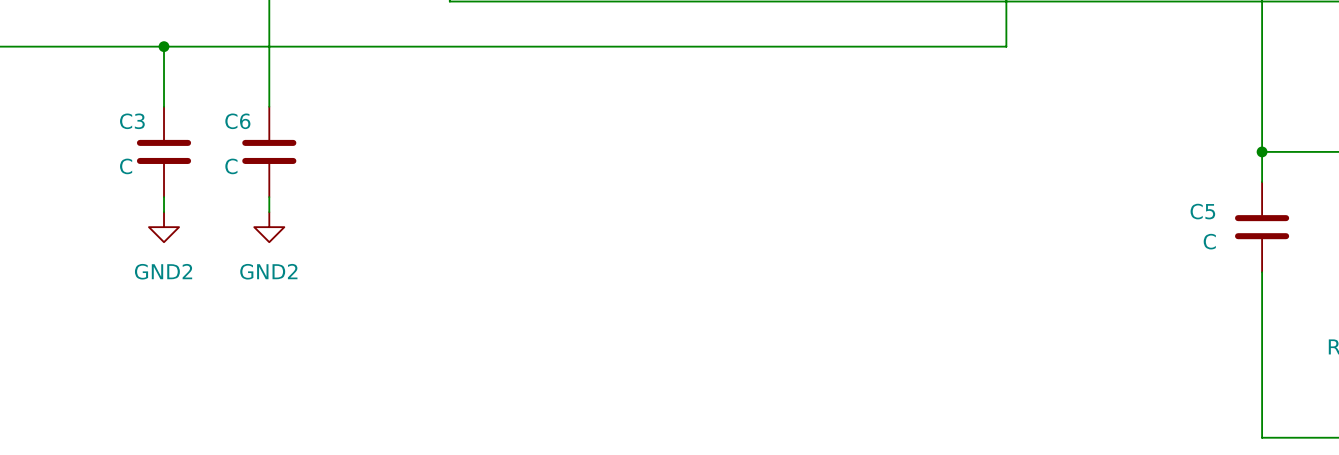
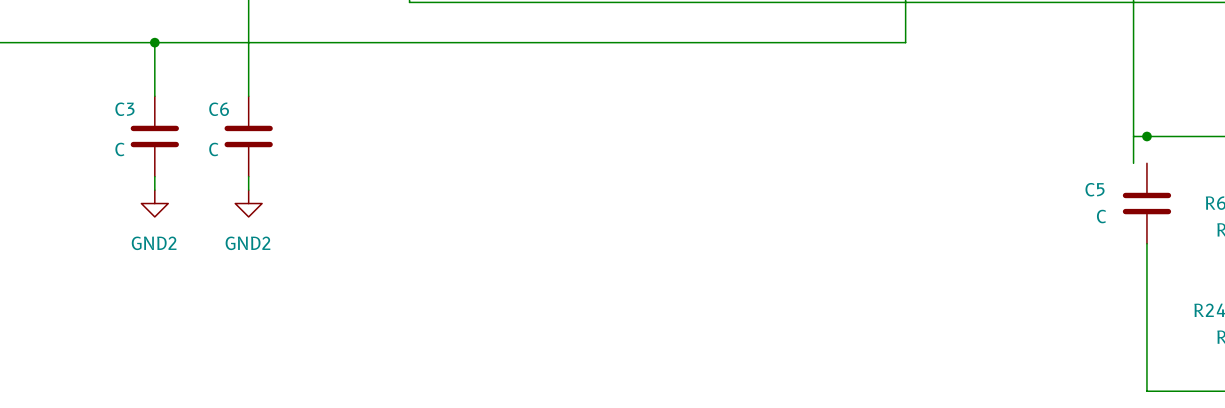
junction position: (1262, 151) -> (1146, 136)
C5 position: (1262, 227) -> (1146, 203)
wire: (1262, 272) (1262, 437) (1277, 437) -> (1146, 243) (1146, 391)

